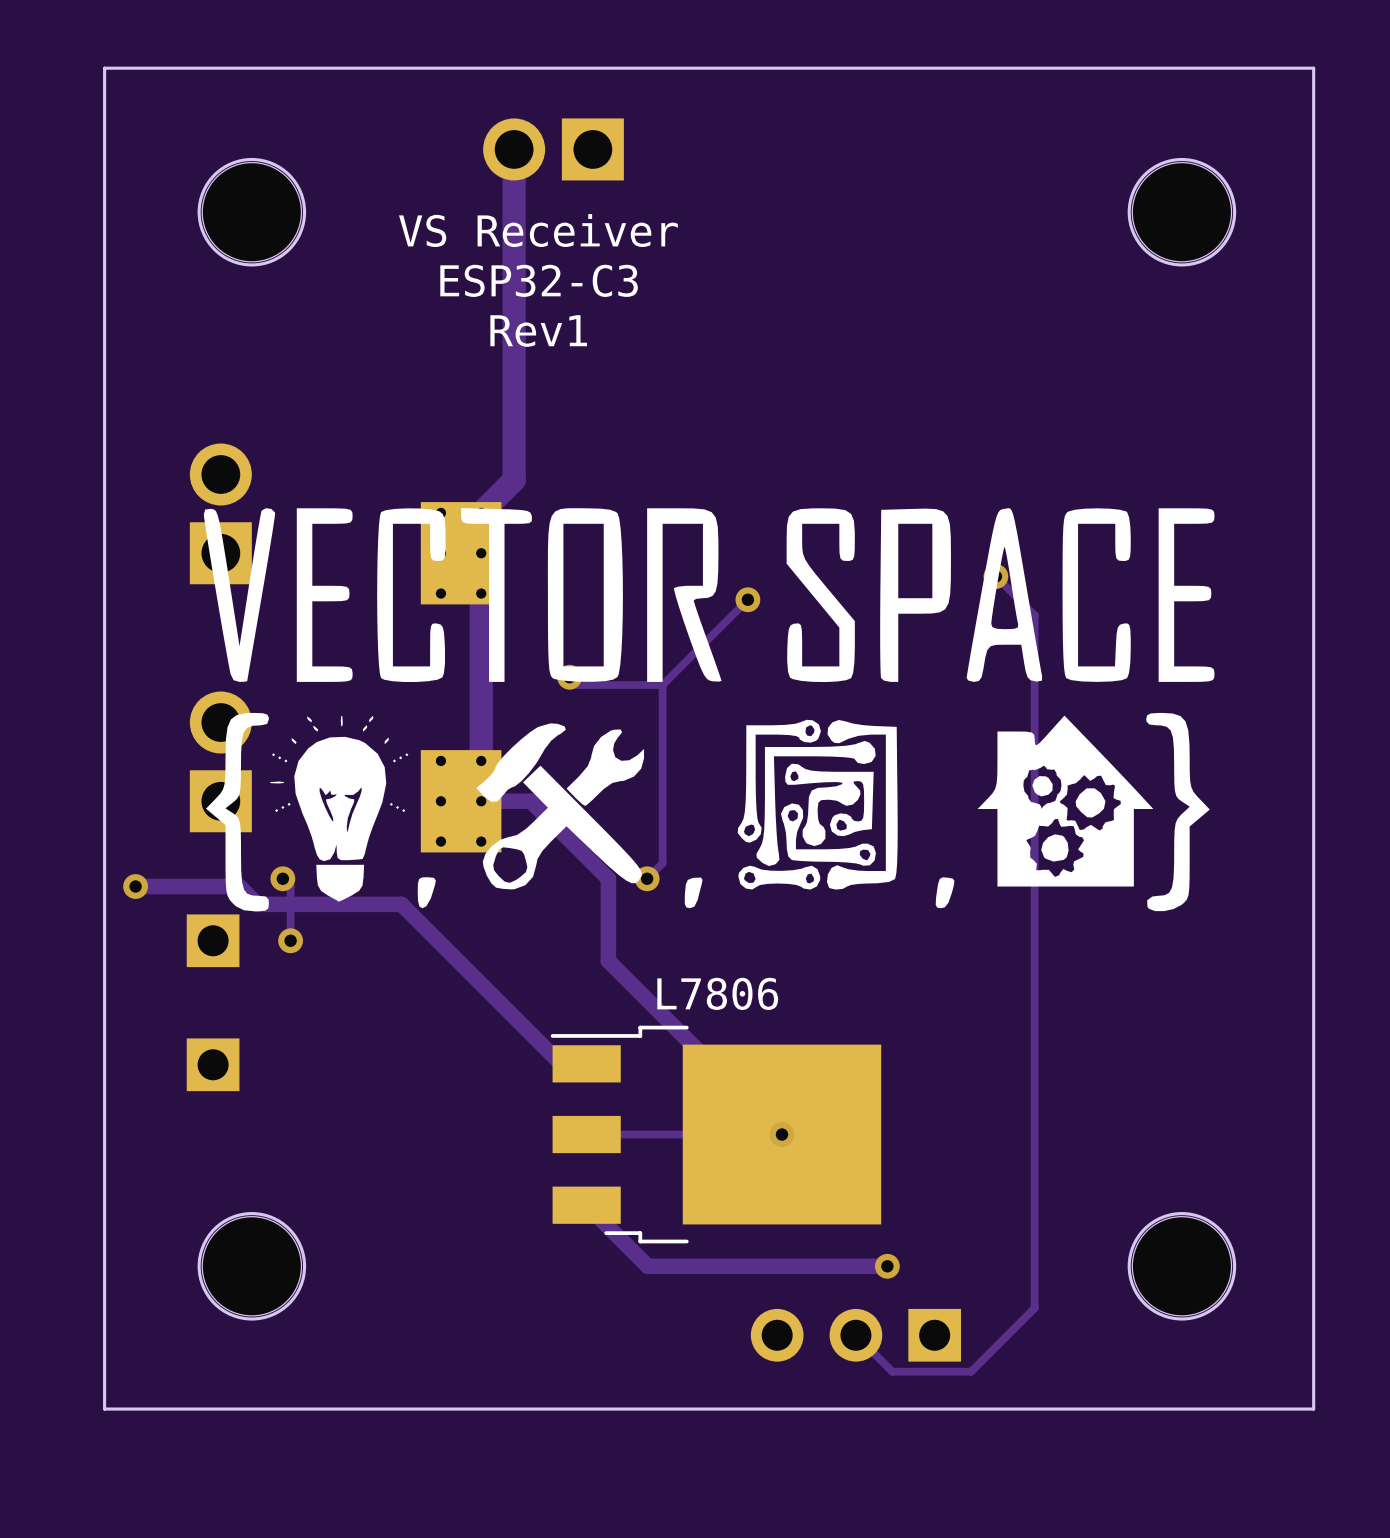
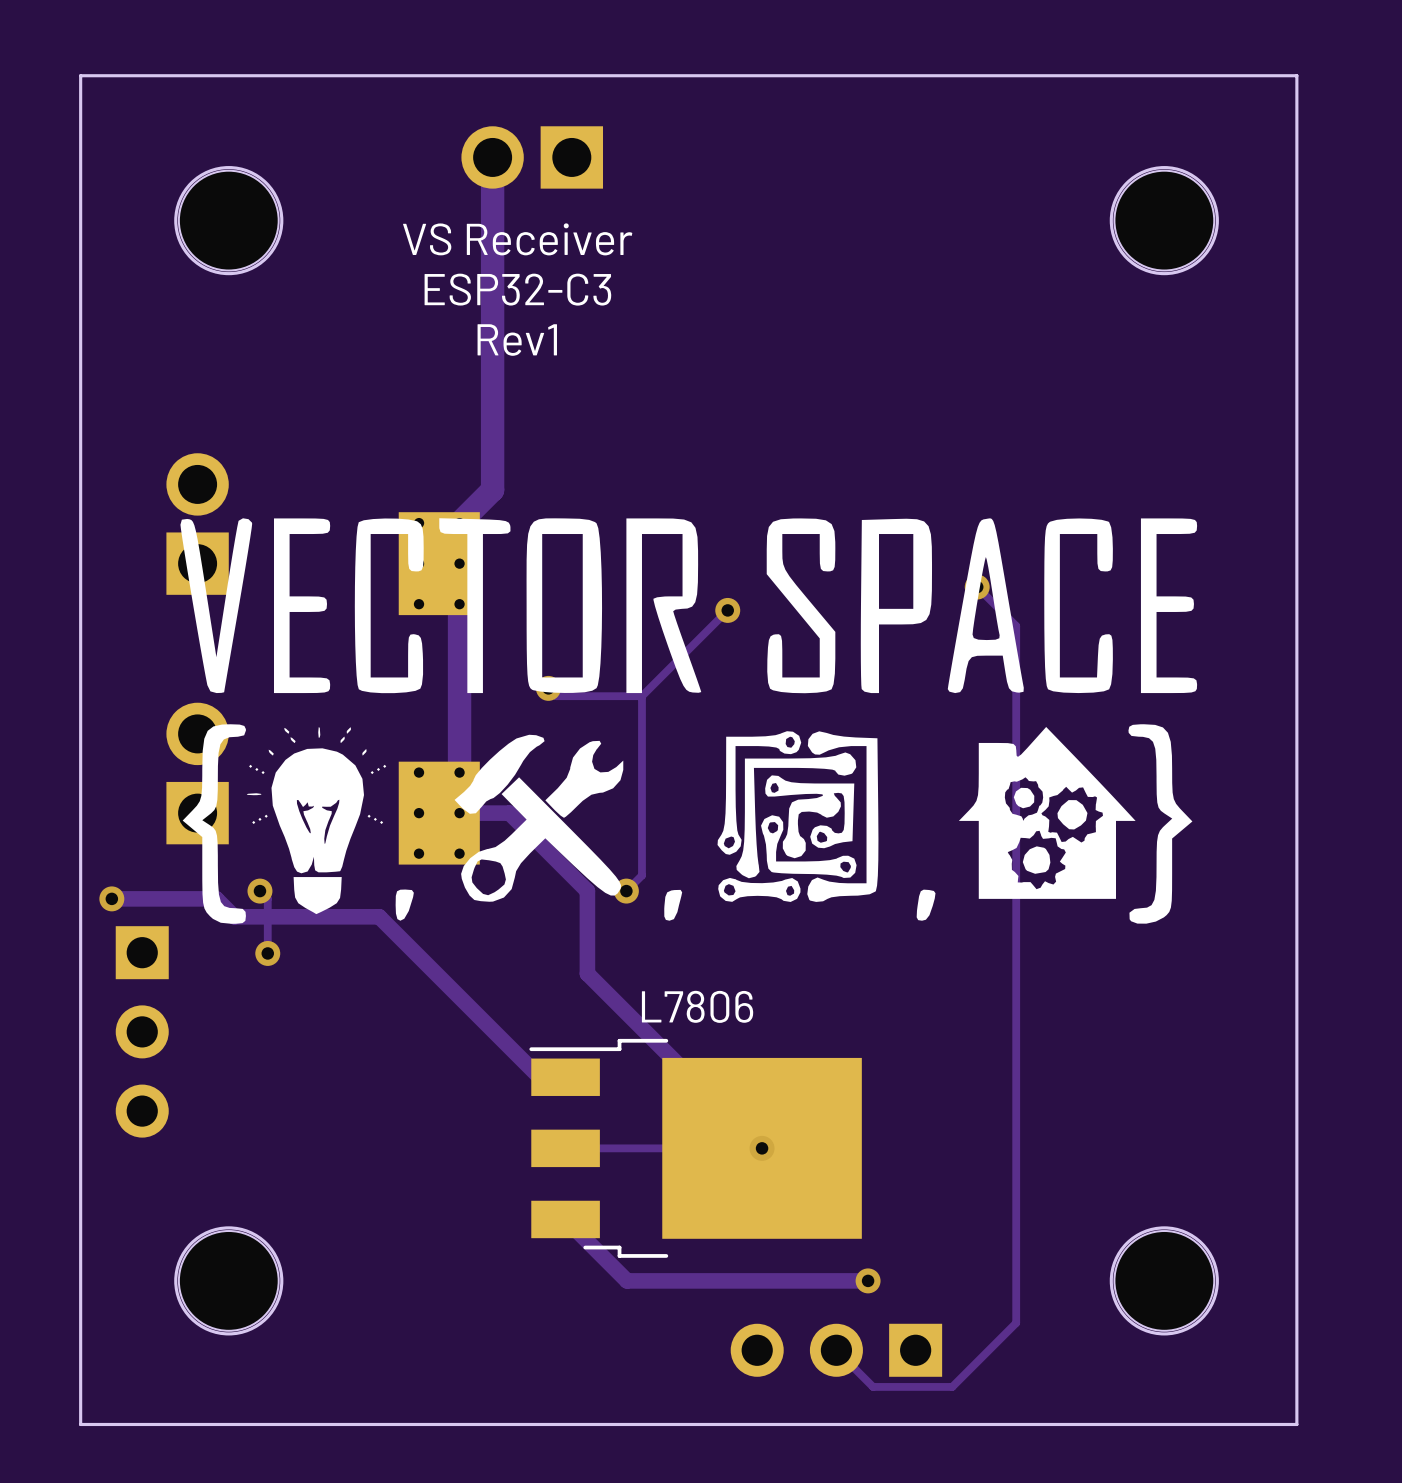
part: (213, 940) -> none
part: none -> (142, 1031)
part: (213, 1064) -> none

